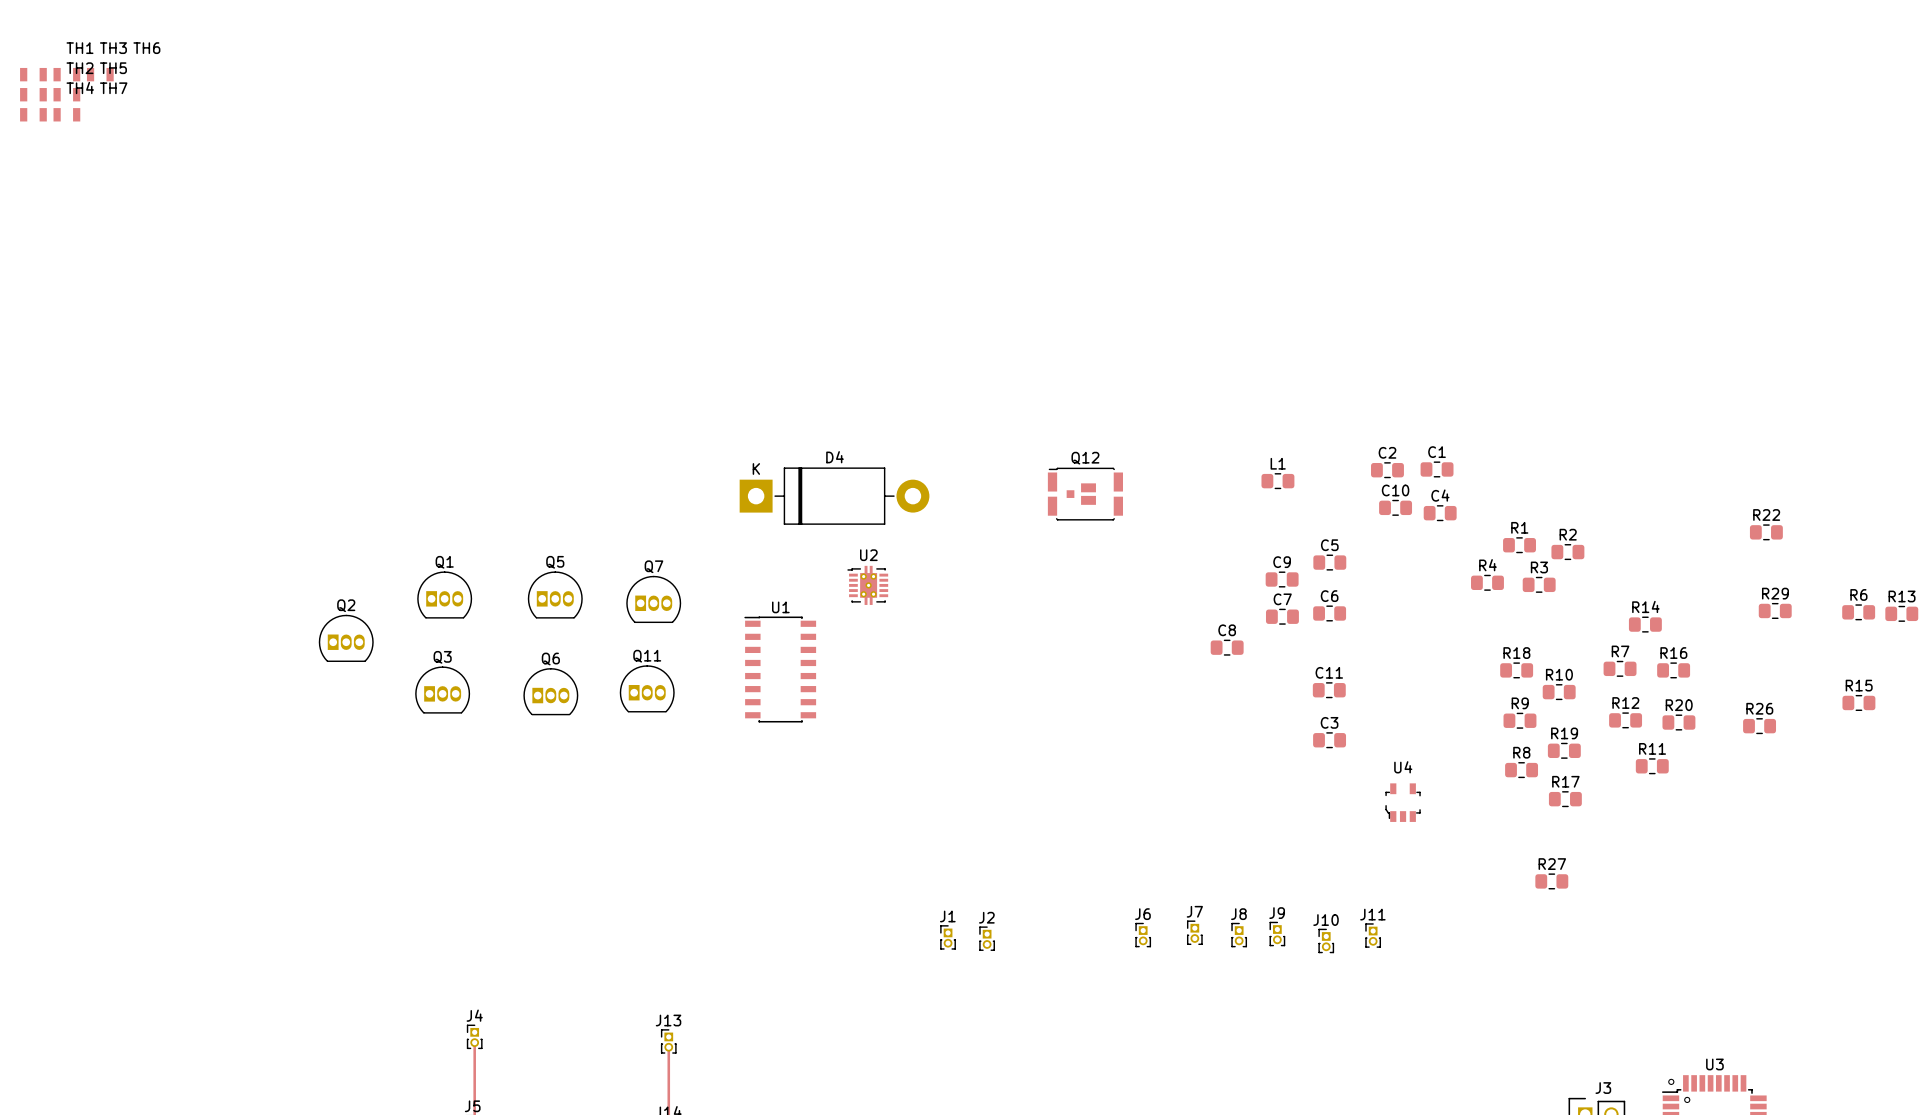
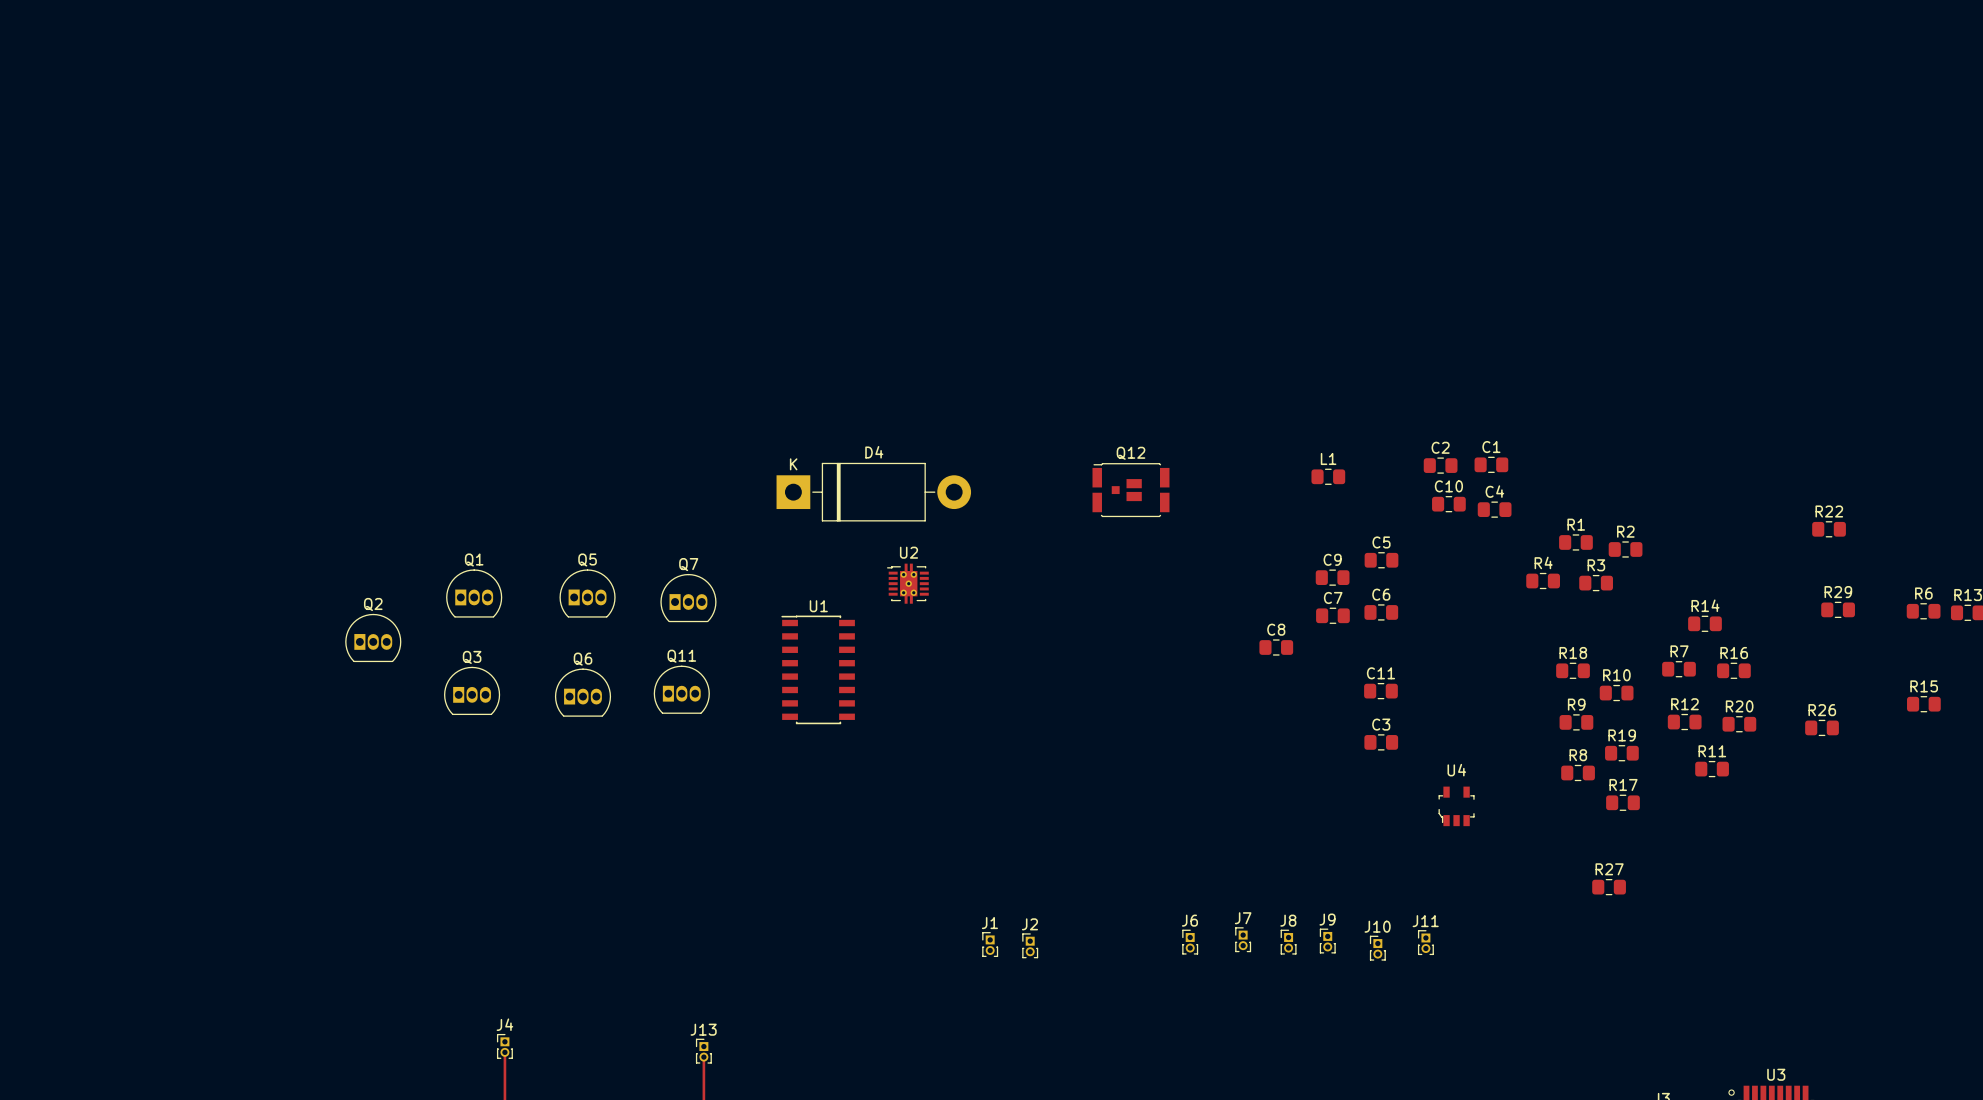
TH1: (33, 74) -> none
TH3: (66, 74) -> none
TH6: (100, 74) -> none
TH2: (33, 94) -> none
TH5: (66, 94) -> none
TH4: (33, 114) -> none
TH7: (66, 114) -> none

